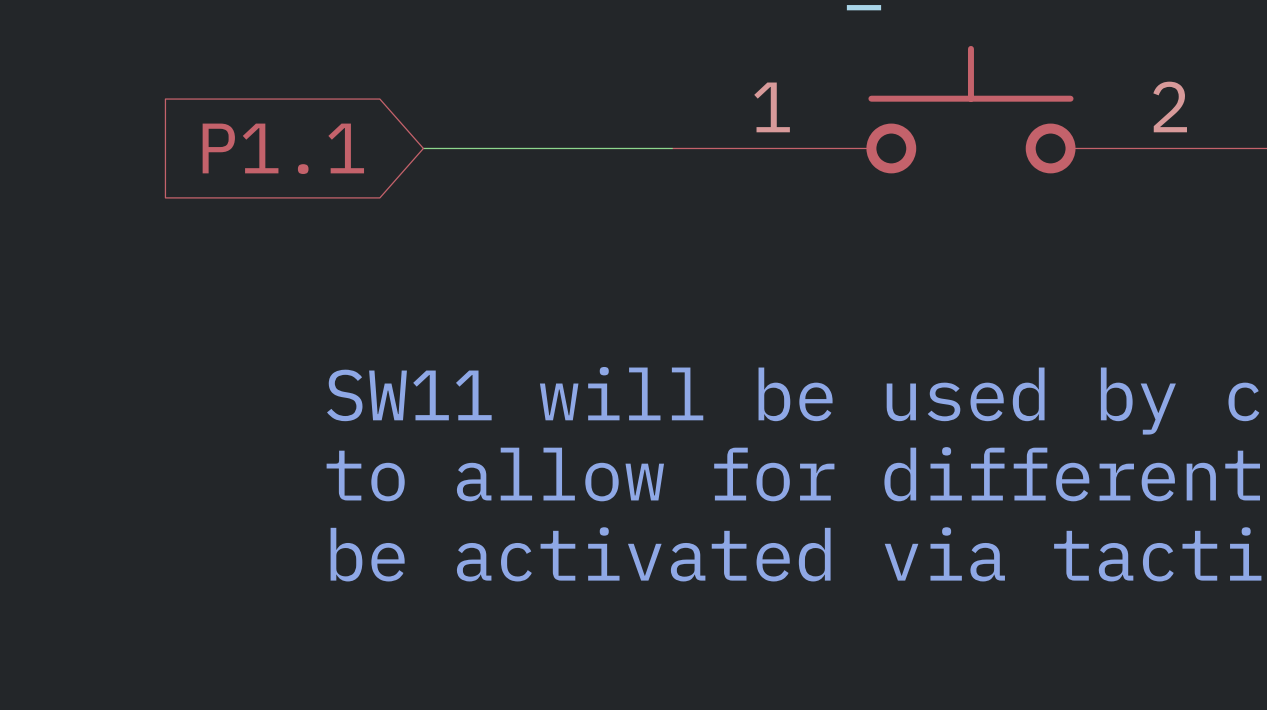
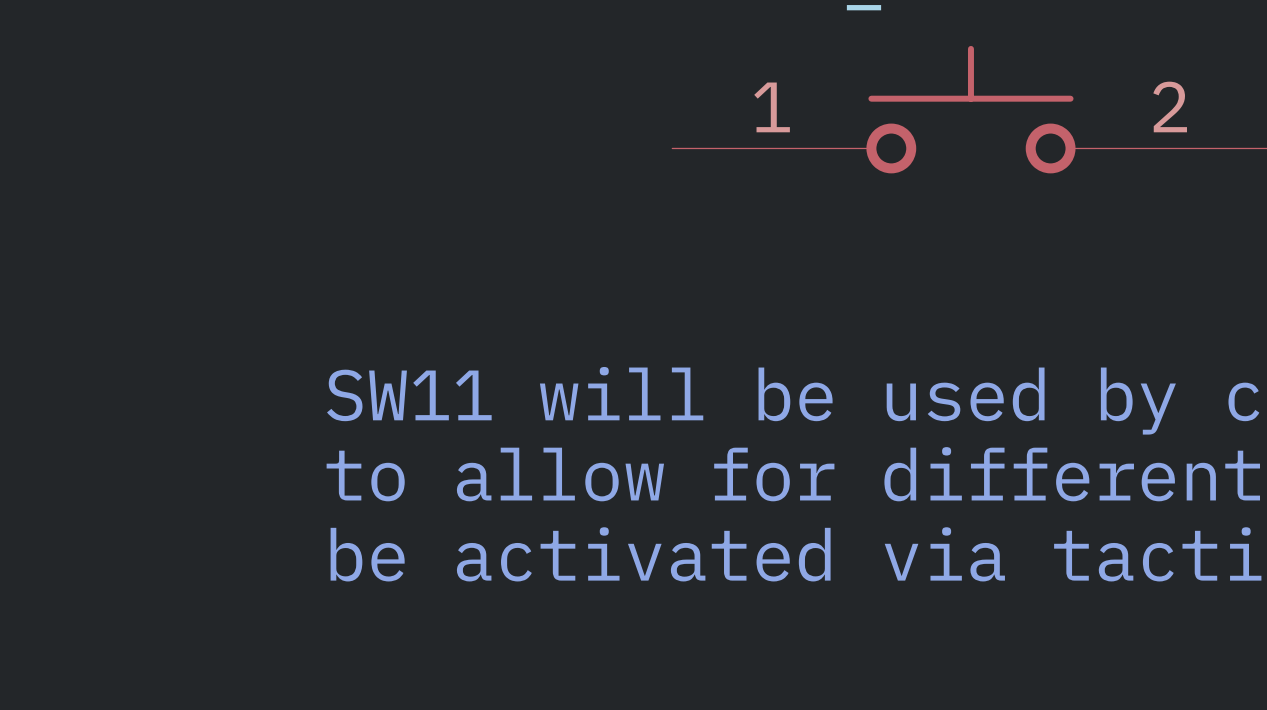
global label: P1.1 (283, 148) -> none
wire: (423, 148) (672, 148) -> none

